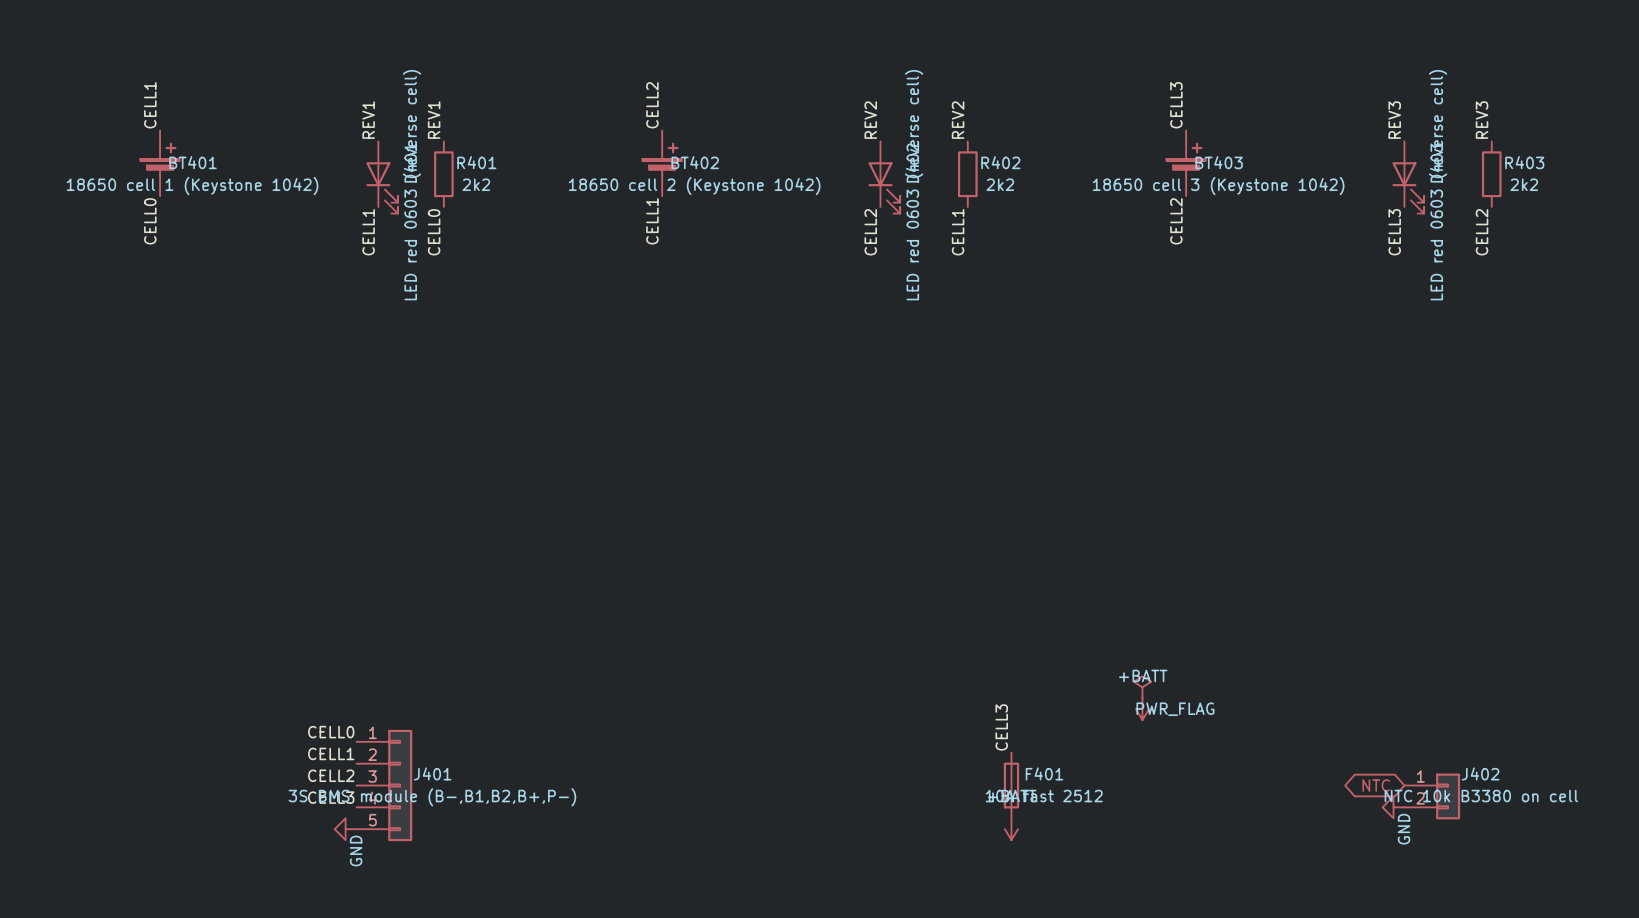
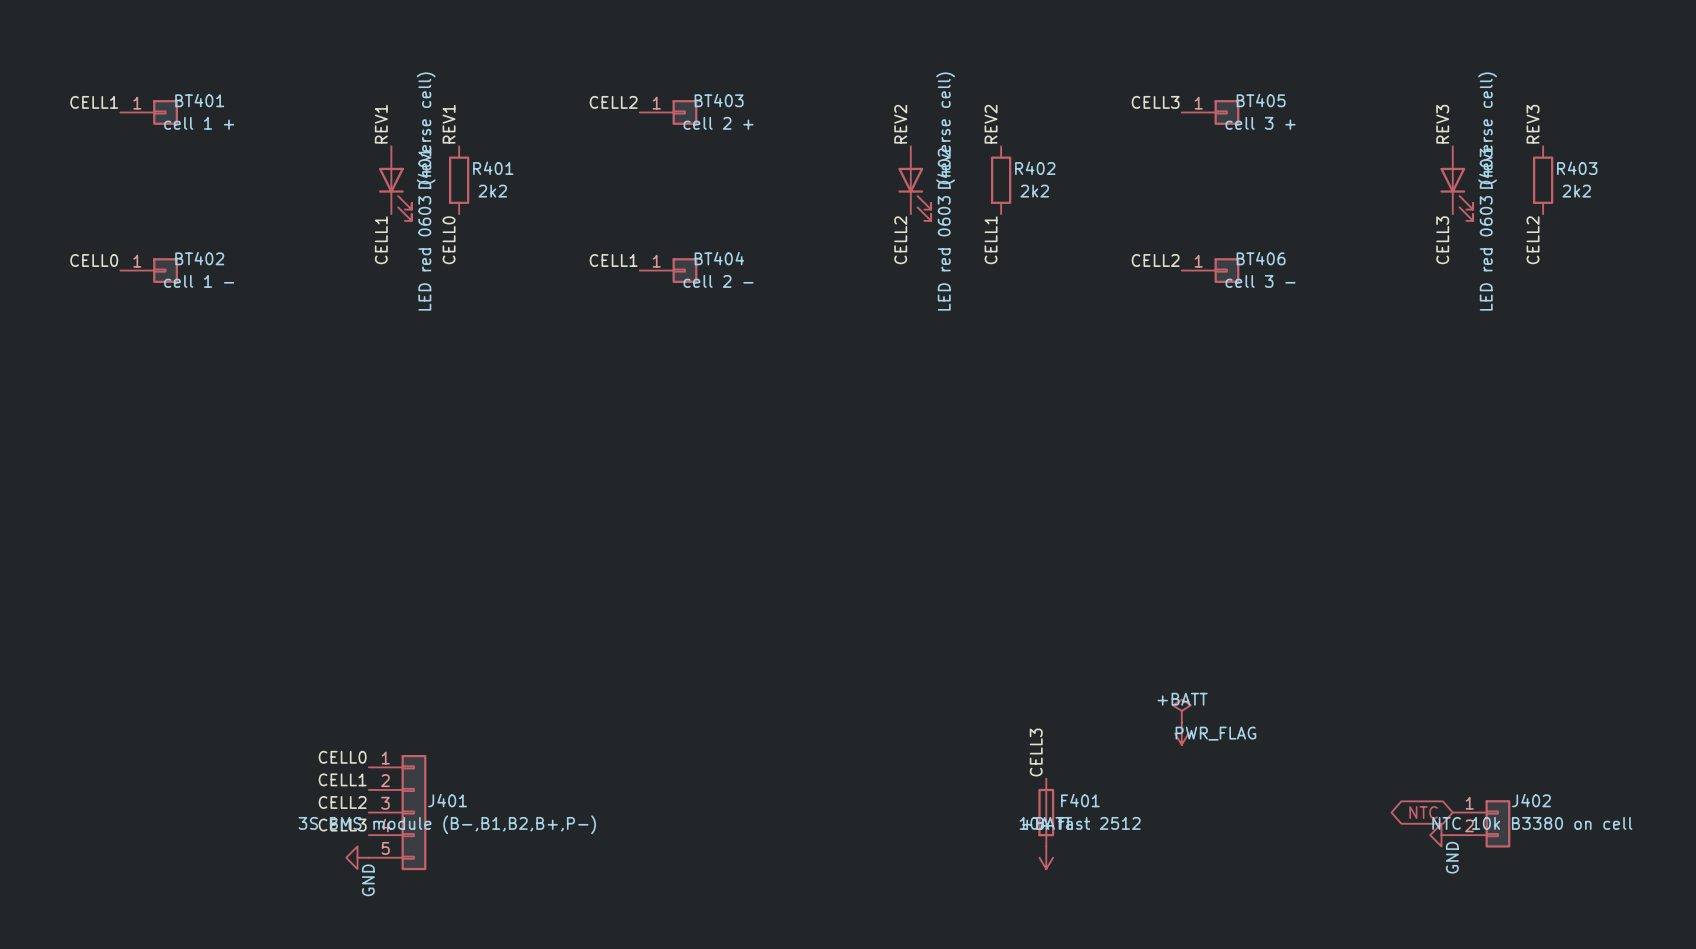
label rotation: 0° (150, 105) -> 90° clockwise (94, 102)
label position: CELL1 (150, 105) -> CELL1 (94, 102)
label rotation: 0° (652, 105) -> 90° clockwise (613, 102)
label position: CELL2 (652, 105) -> CELL2 (613, 102)
label rotation: 0° (1176, 105) -> 90° clockwise (1155, 102)
label position: CELL3 (1176, 105) -> CELL3 (1155, 102)
BT405: none -> cell 3 + (1210, 112)
BT401 symbol: [140, 130, 180, 197] -> [120, 100, 178, 125]
BT402 symbol: [642, 130, 682, 197] -> [120, 258, 178, 283]
BT403 symbol: [1166, 130, 1206, 197] -> [639, 100, 698, 125]
BT401 name position: BT401 (193, 162) -> BT401 (199, 100)
BT402 name position: BT402 (695, 162) -> BT402 (199, 258)
BT403 name position: BT403 (1219, 162) -> BT403 (719, 100)
BT401 value: 18650 cell 1 (Keystone 1042) (192, 186) -> cell 1 + (199, 123)
BT402 value: 18650 cell 2 (Keystone 1042) (694, 186) -> cell 1 - (199, 281)
BT403 value: 18650 cell 3 (Keystone 1042) (1218, 186) -> cell 2 + (718, 123)
label rotation: 0° (150, 221) -> 90° clockwise (94, 260)
label position: CELL0 (150, 221) -> CELL0 (94, 260)
label rotation: 0° (652, 221) -> 90° clockwise (613, 260)
label position: CELL1 (652, 221) -> CELL1 (613, 260)
label rotation: 0° (1176, 221) -> 90° clockwise (1155, 260)
label position: CELL2 (1176, 221) -> CELL2 (1155, 260)
BT404: none -> cell 2 - (668, 270)
BT406: none -> cell 3 - (1210, 270)

